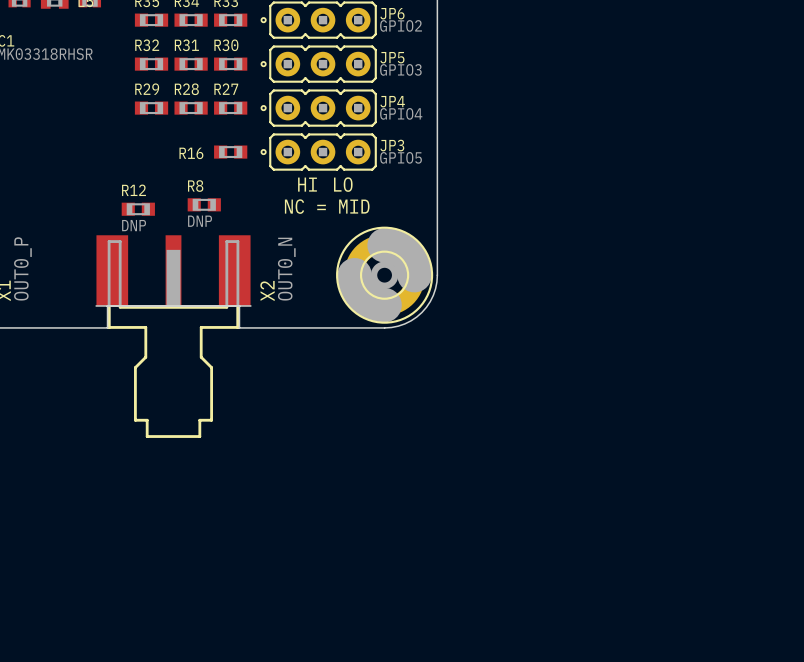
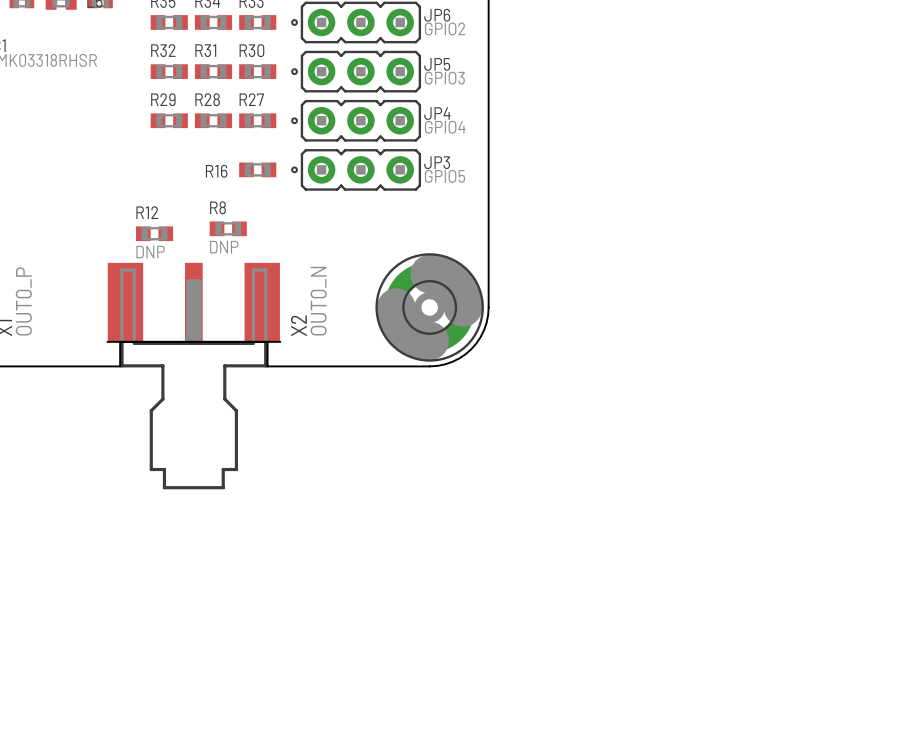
text: HI (307, 184) -> none
text: LO (343, 184) -> none
text: NC = MID (327, 206) -> none

